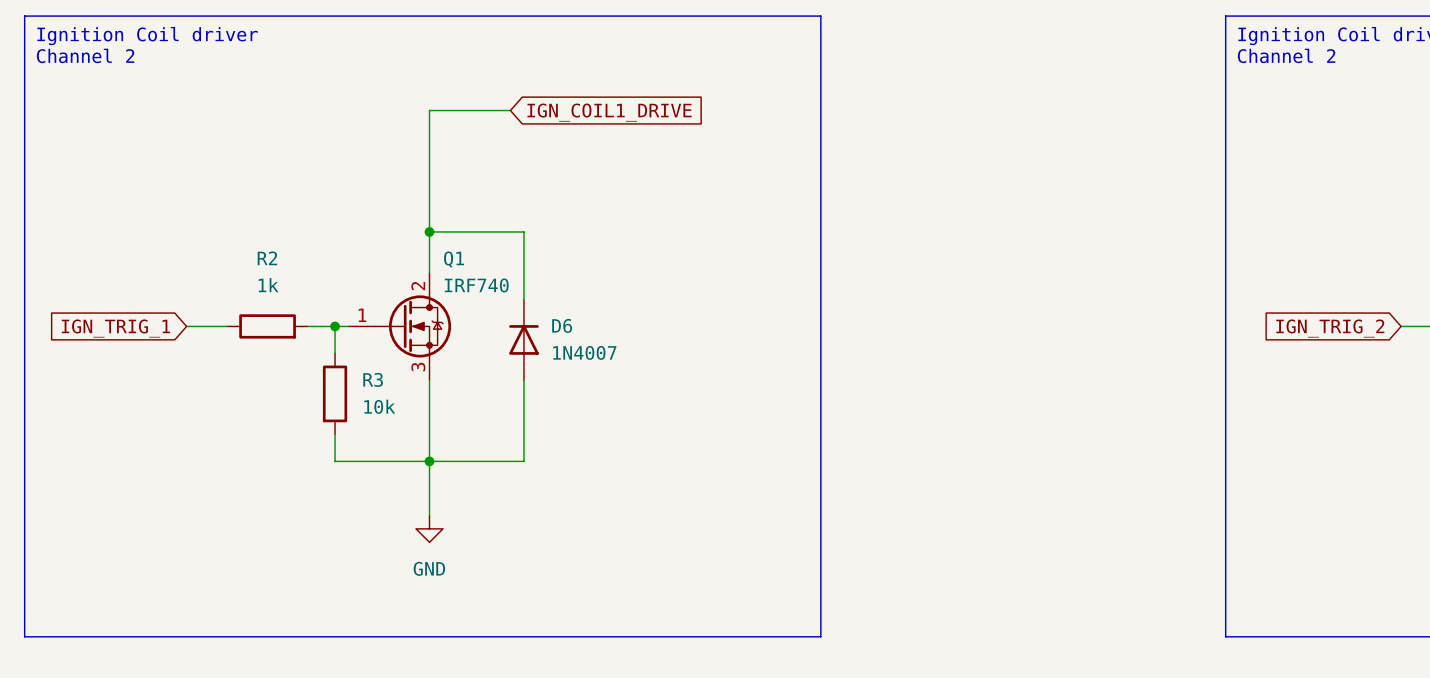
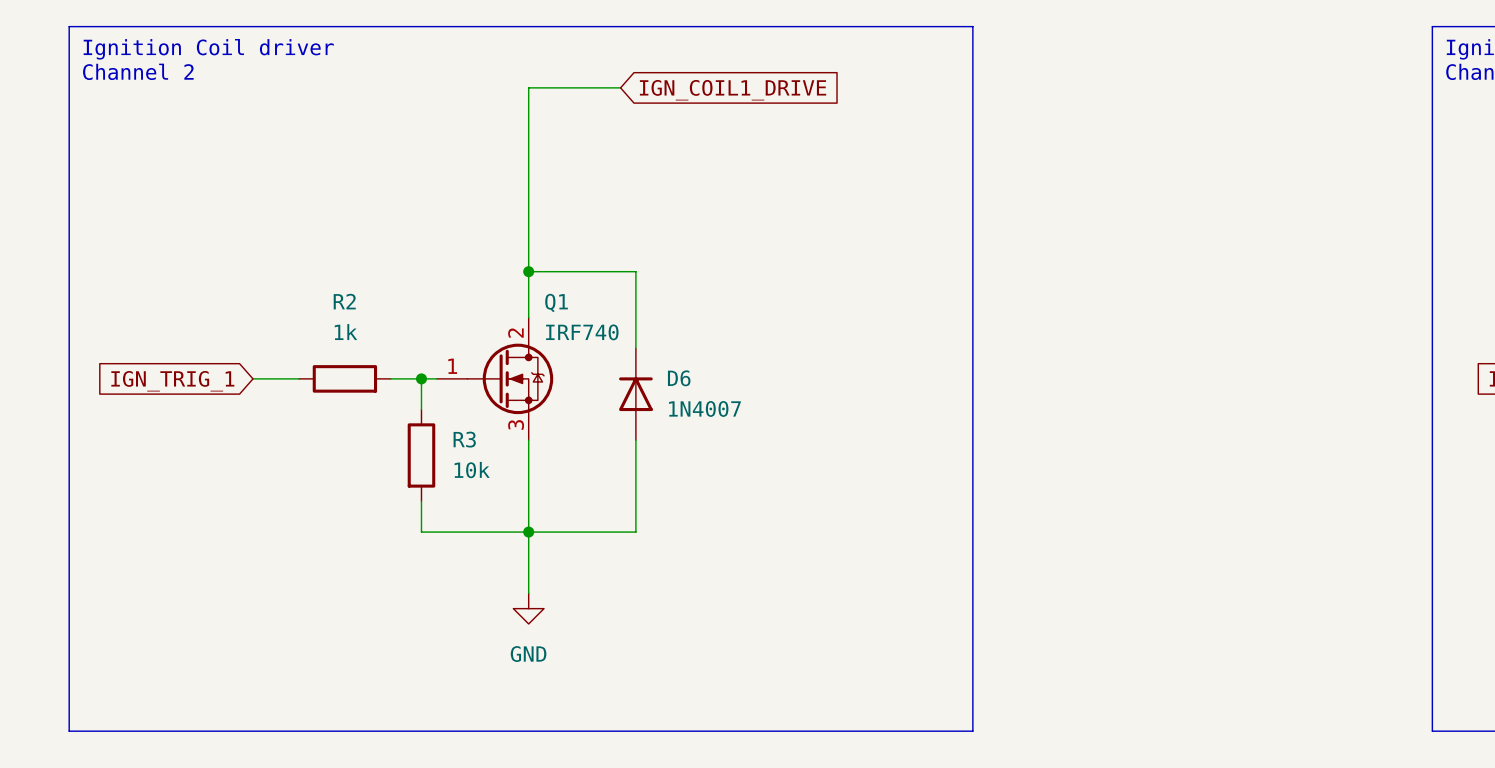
wire: (429, 110) (510, 110) -> (528, 133) (528, 87) (620, 87)
global label position: IGN_COIL1_DRIVE (609, 112) -> IGN_COIL1_DRIVE (733, 90)

